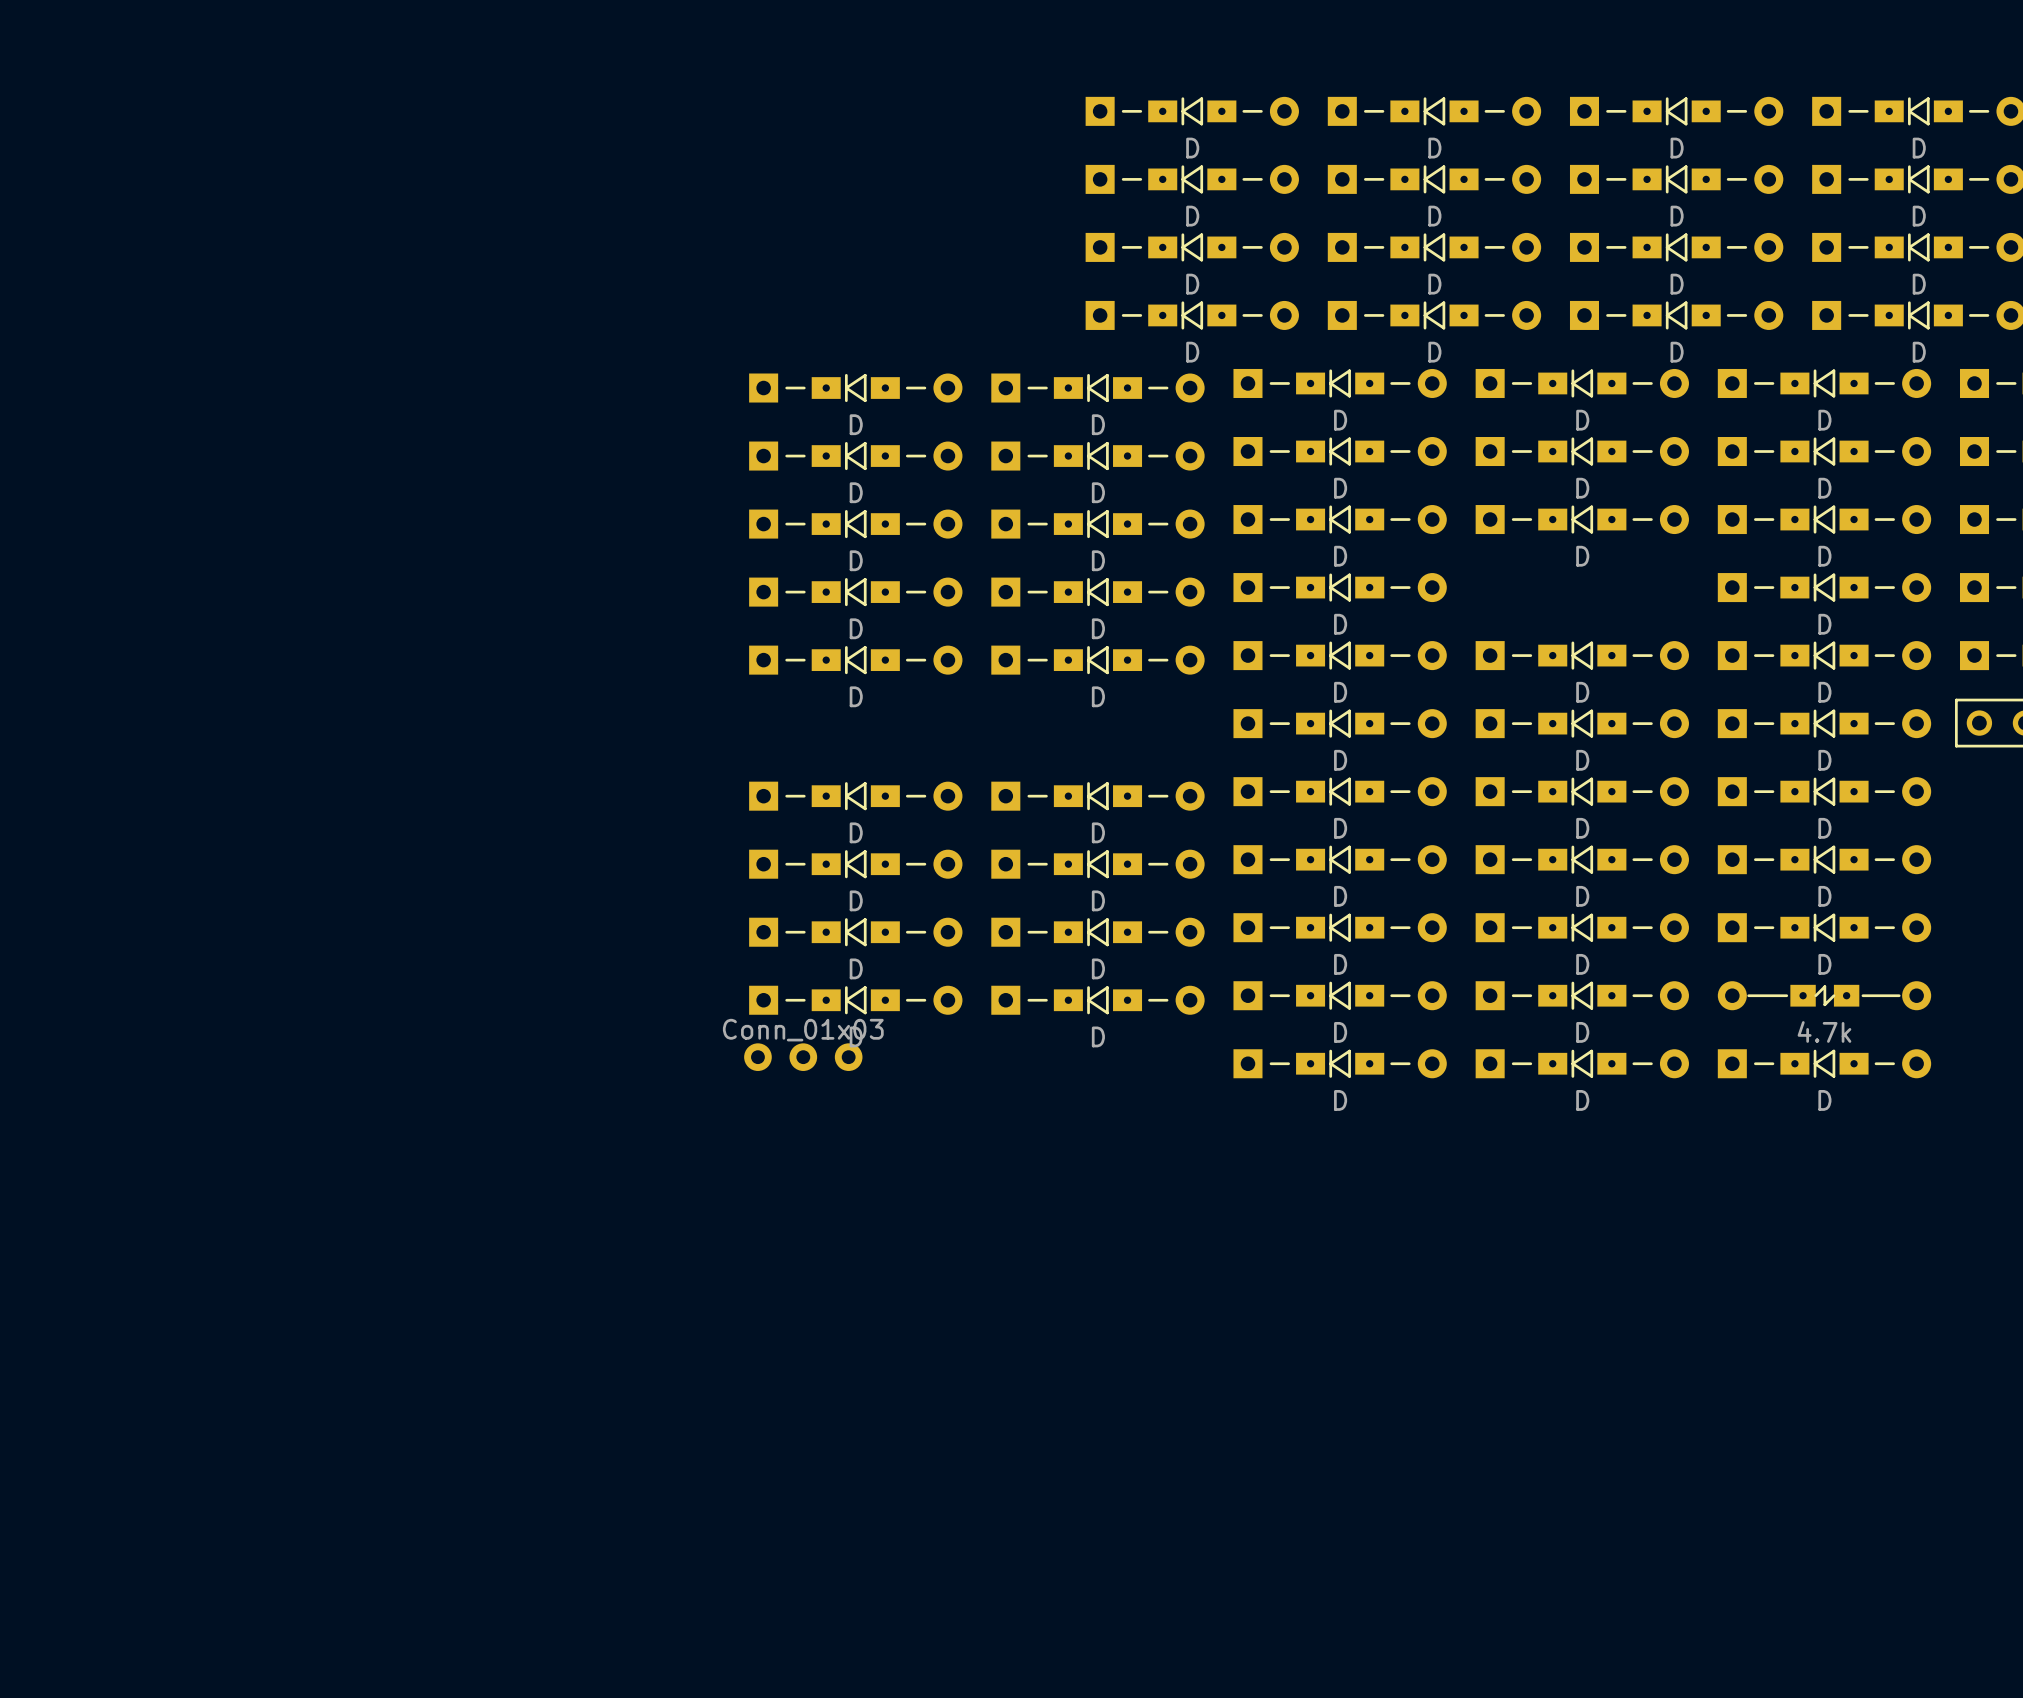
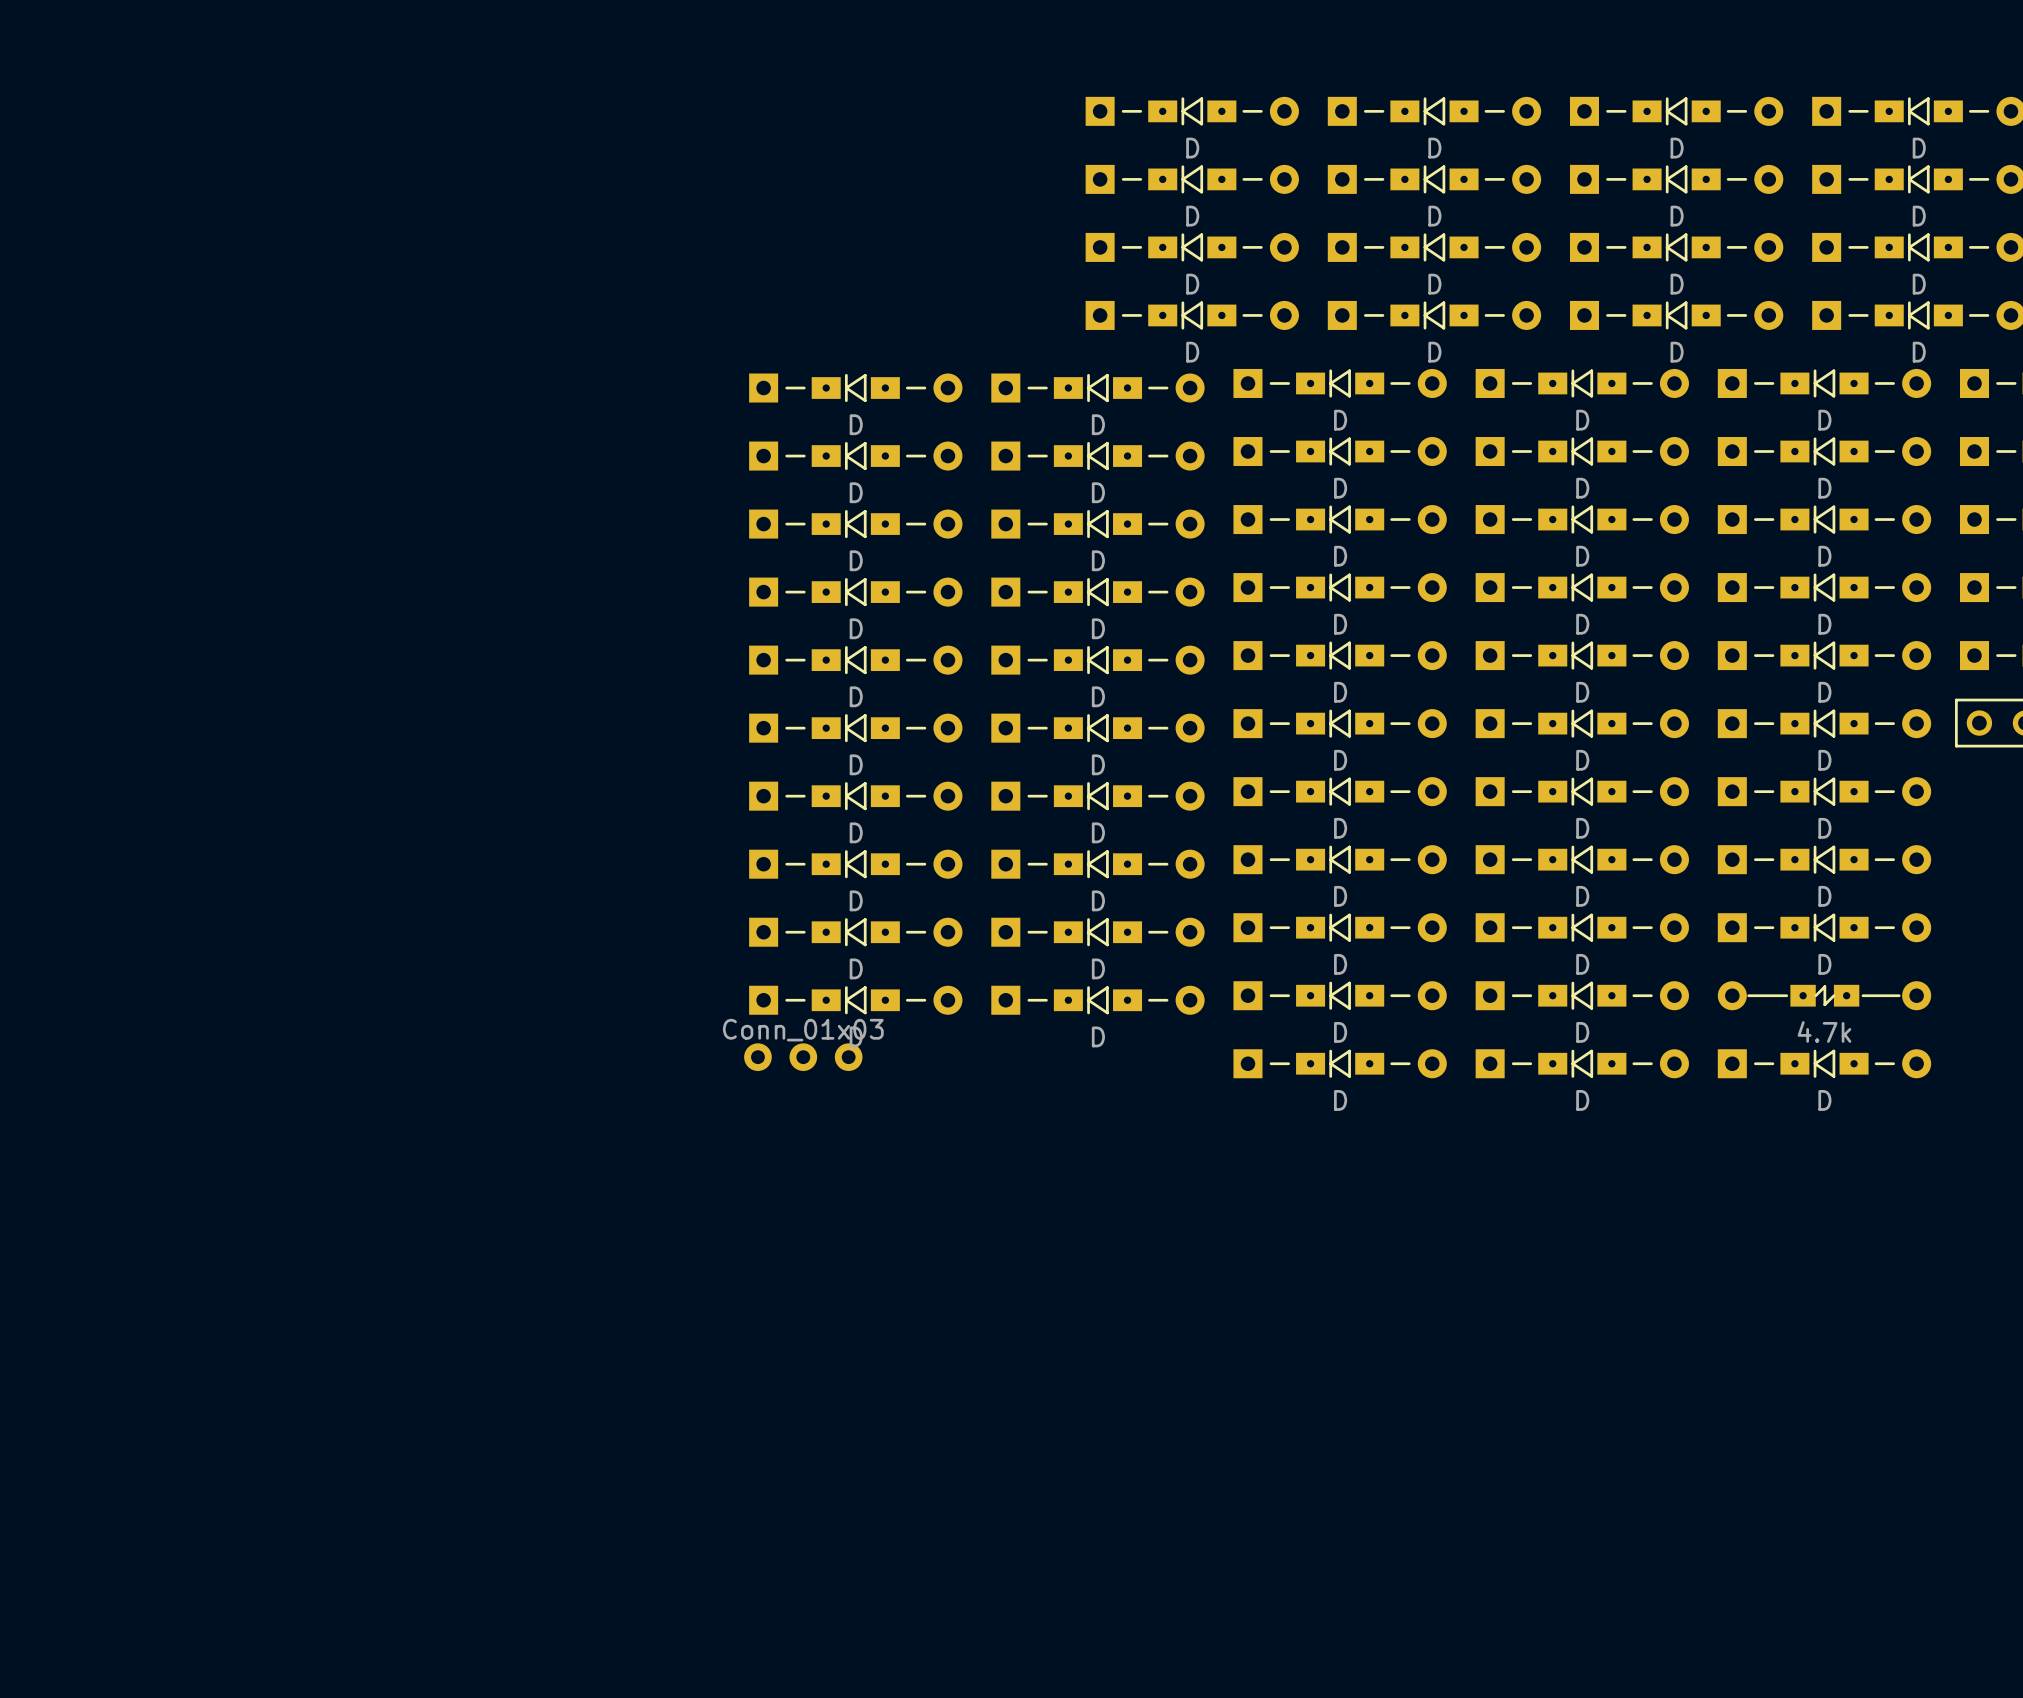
part: none -> D (1582, 587)
part: none -> D (855, 728)
part: none -> D (1097, 728)

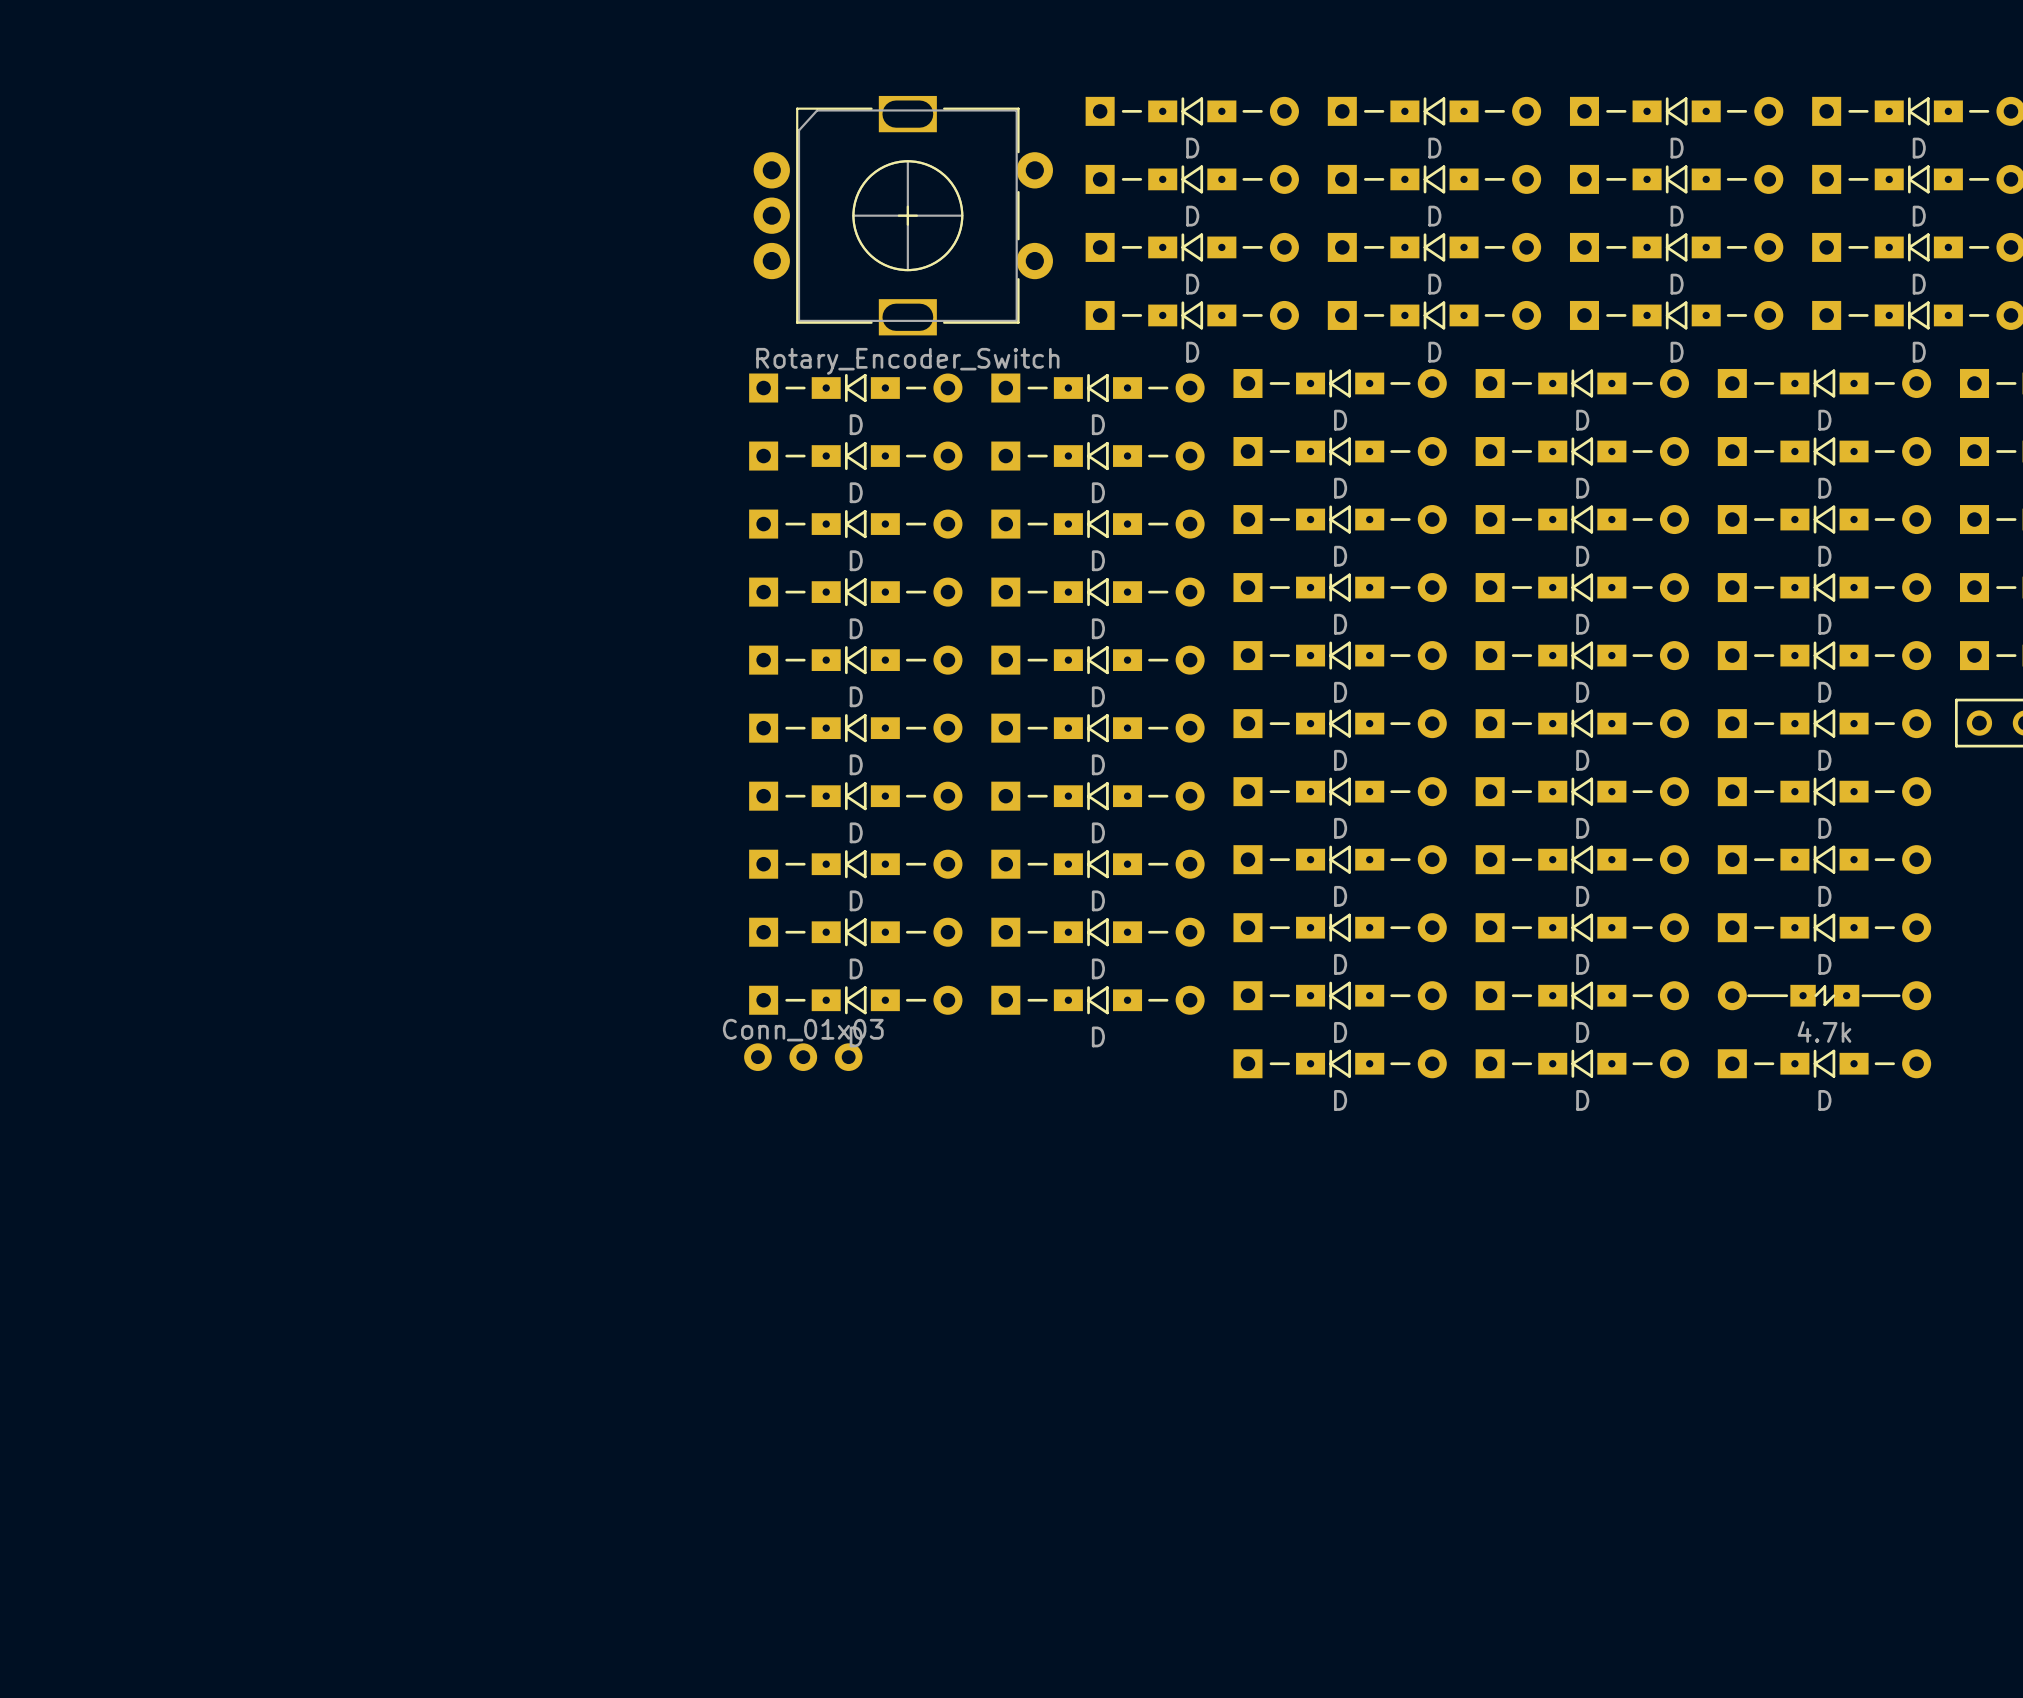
part: none -> Rotary_Encoder_Switch (903, 215)

